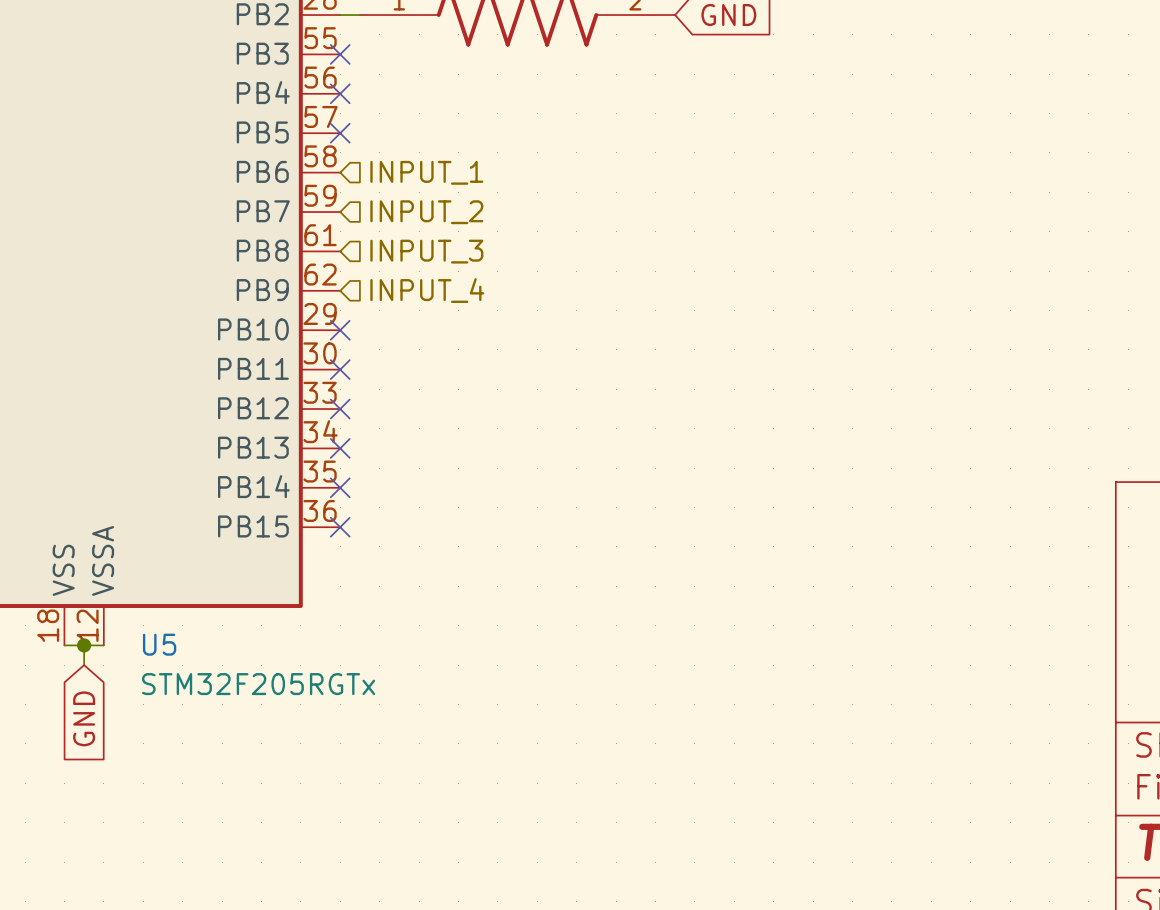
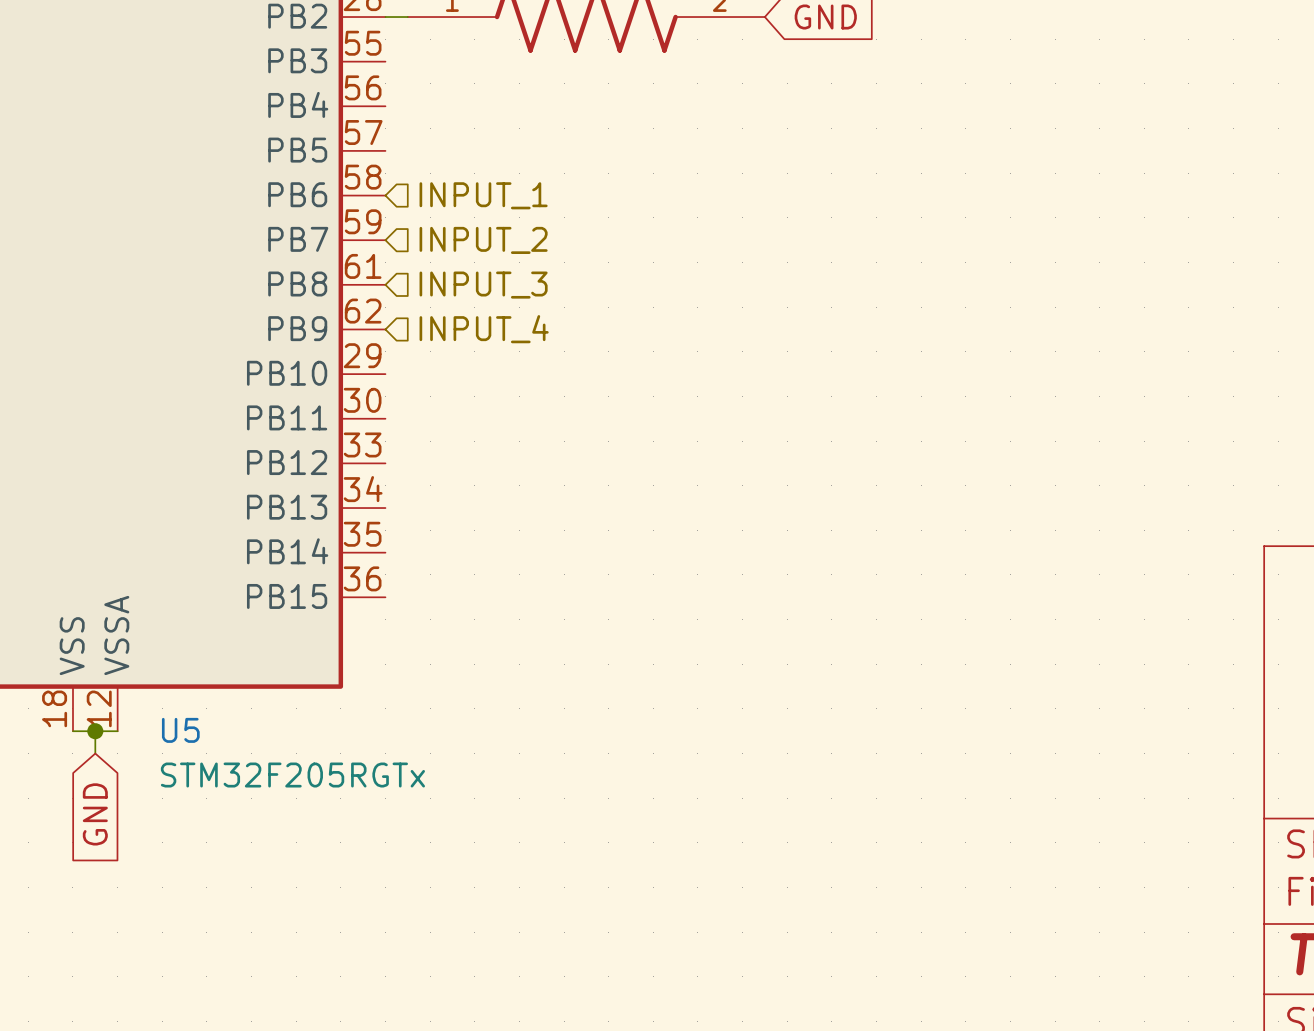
no-connect mark: (340, 54) -> none
no-connect mark: (340, 93) -> none
no-connect mark: (340, 133) -> none
no-connect mark: (340, 330) -> none
no-connect mark: (340, 369) -> none
no-connect mark: (340, 409) -> none
no-connect mark: (340, 448) -> none
no-connect mark: (340, 487) -> none
no-connect mark: (340, 527) -> none

